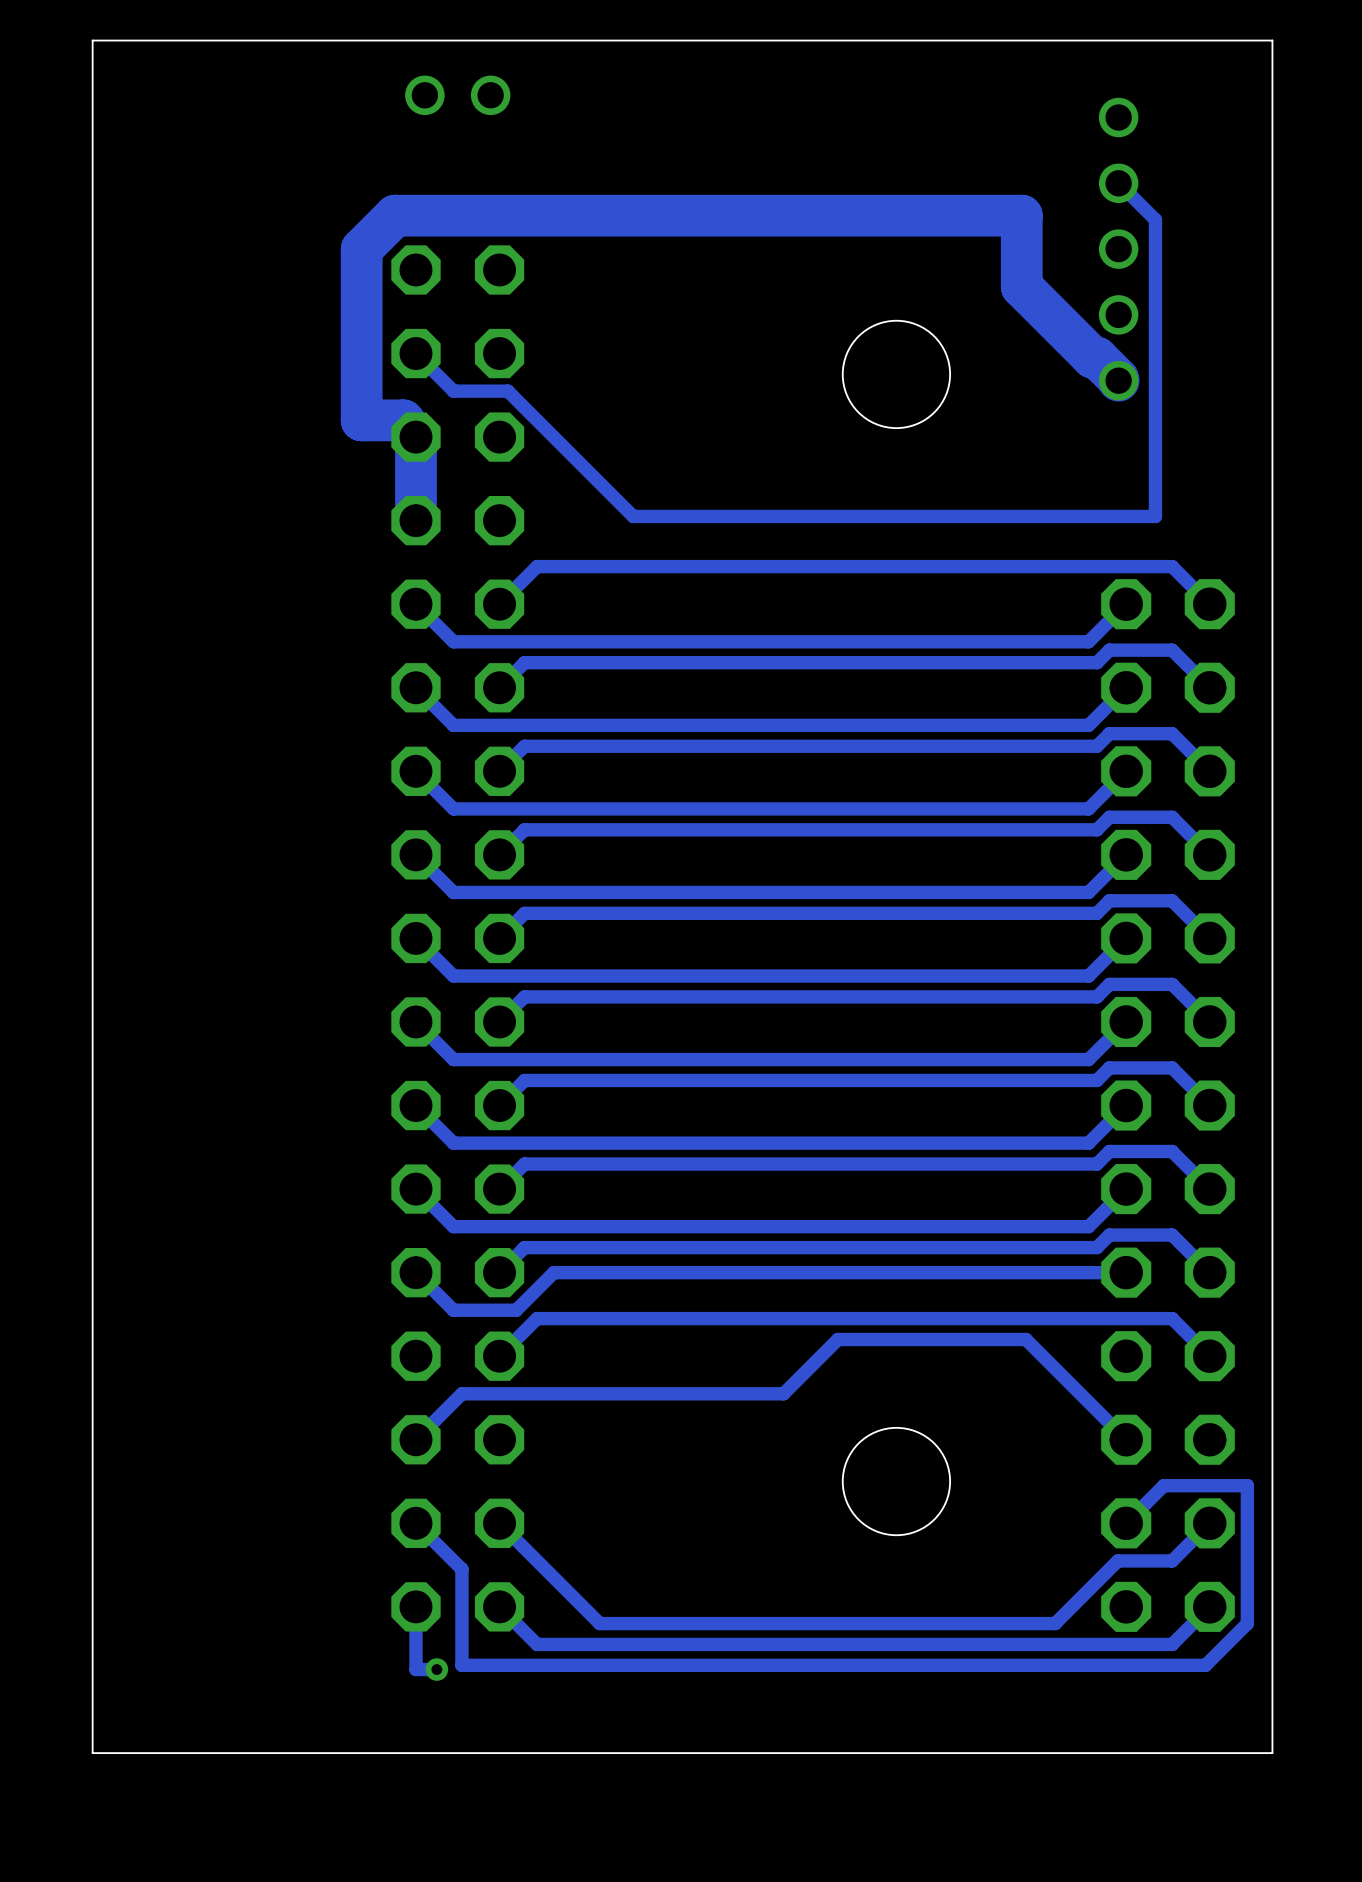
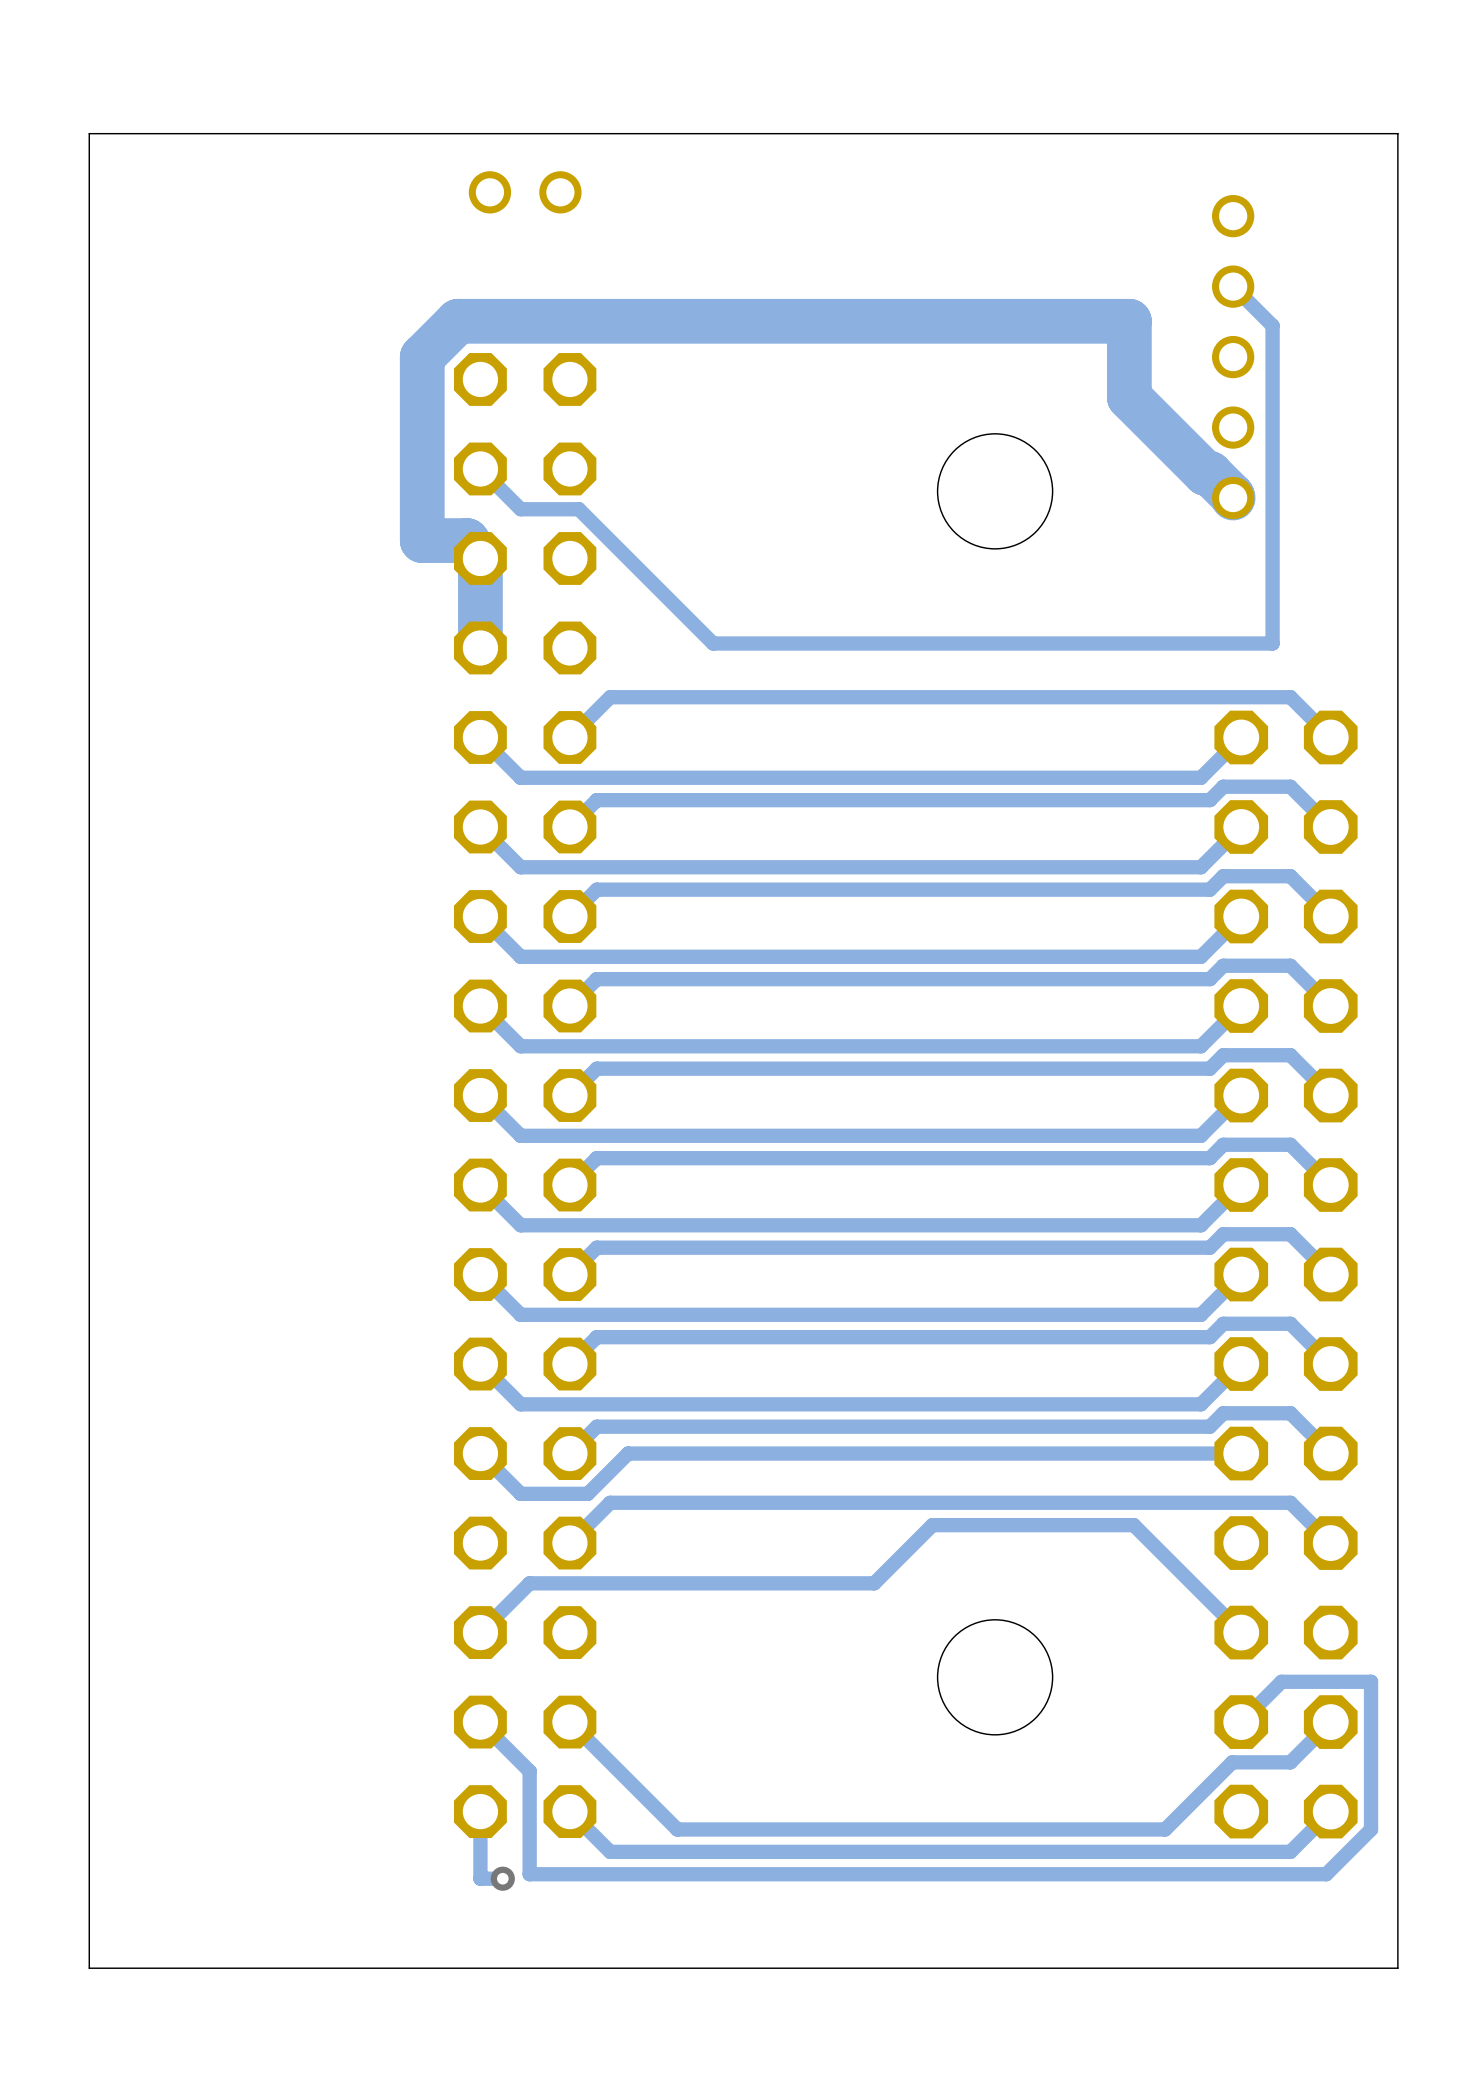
board edge: (92, 40) (92, 1753) -> (134, 133) (89, 133) (89, 1968) (134, 1968)

